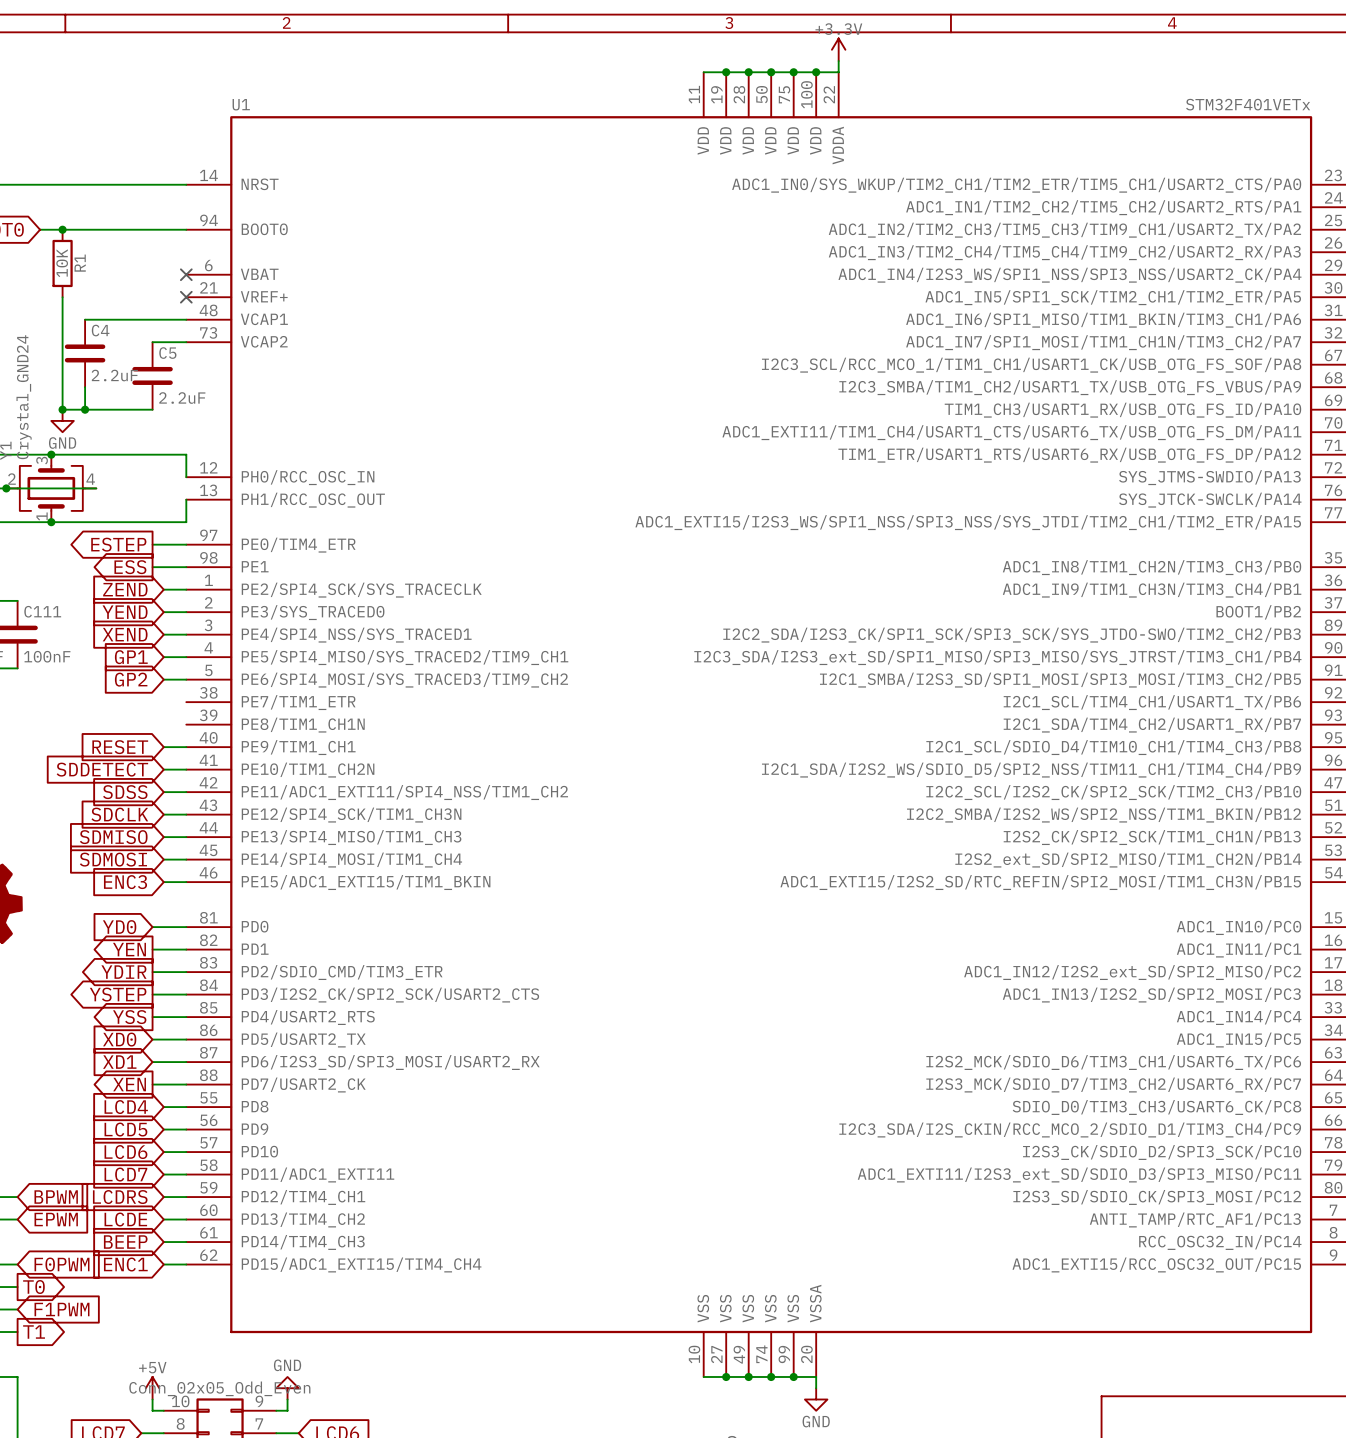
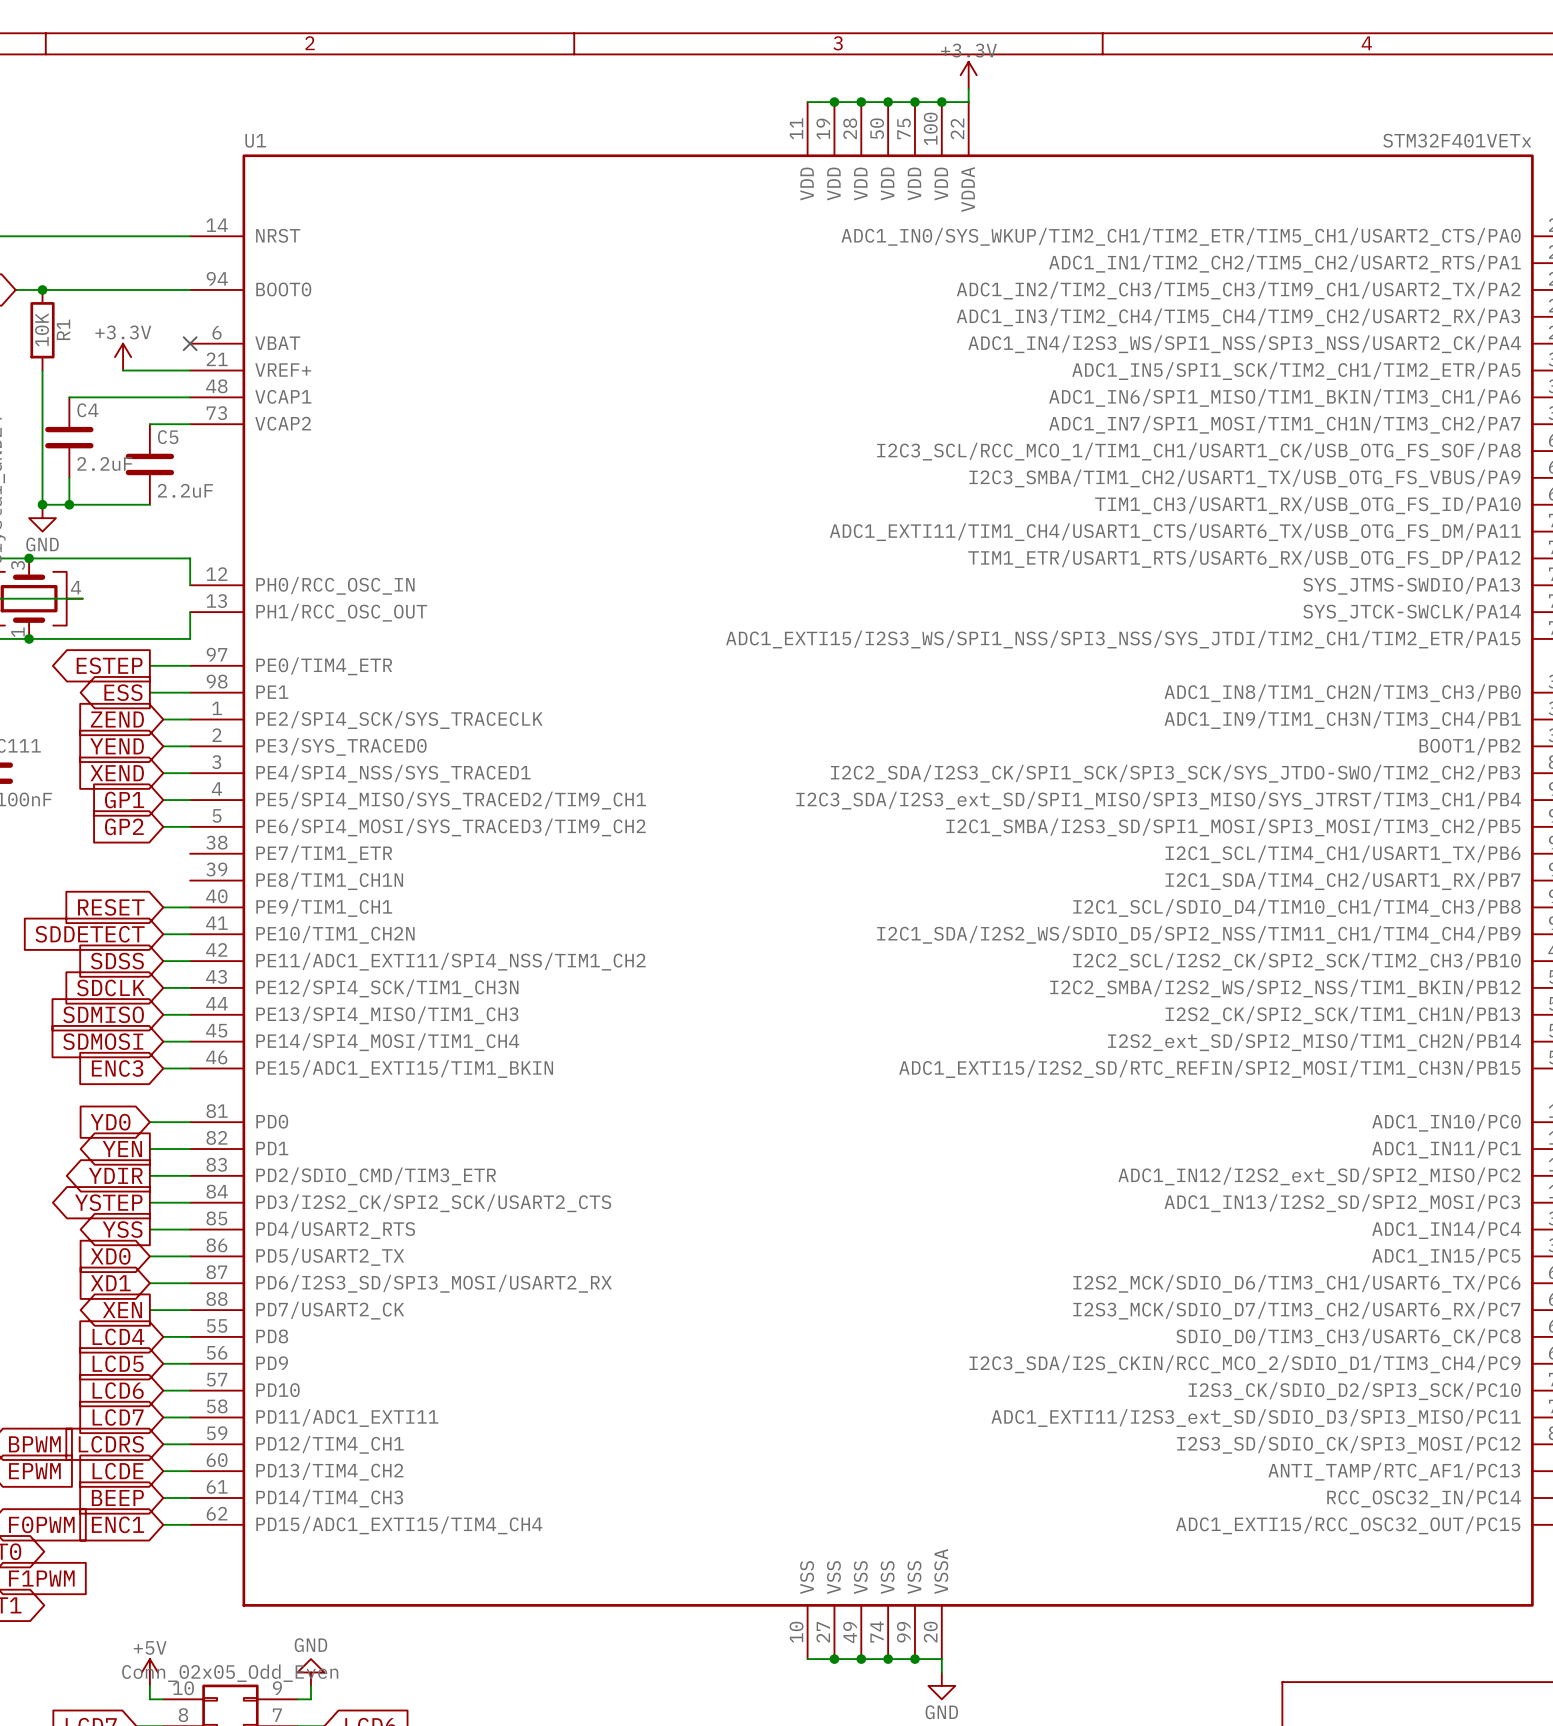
power symbol: none -> +3.3V (123, 357)
wire: none -> (123, 370) (190, 370)
no-connect mark: (186, 297) -> none

